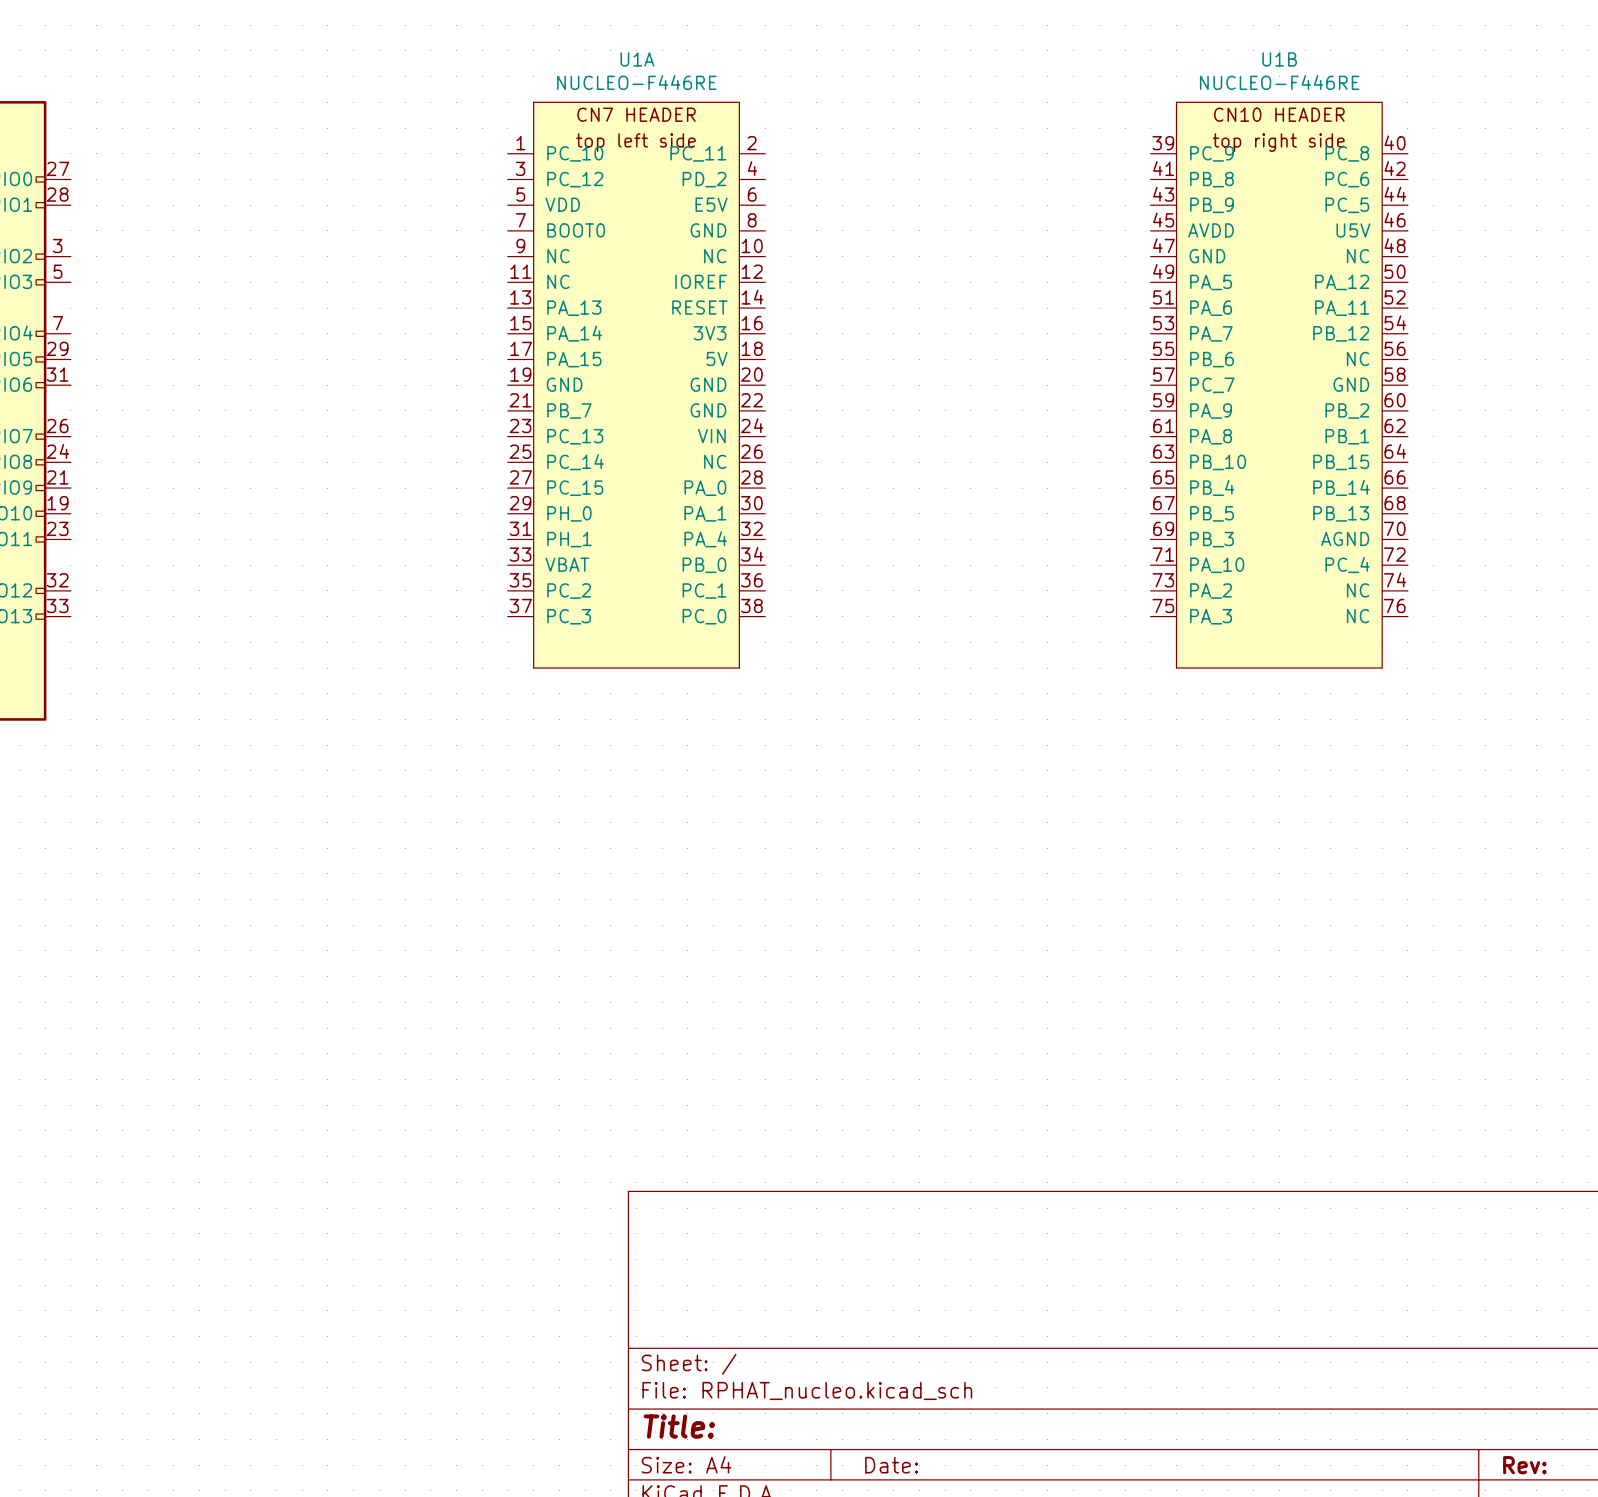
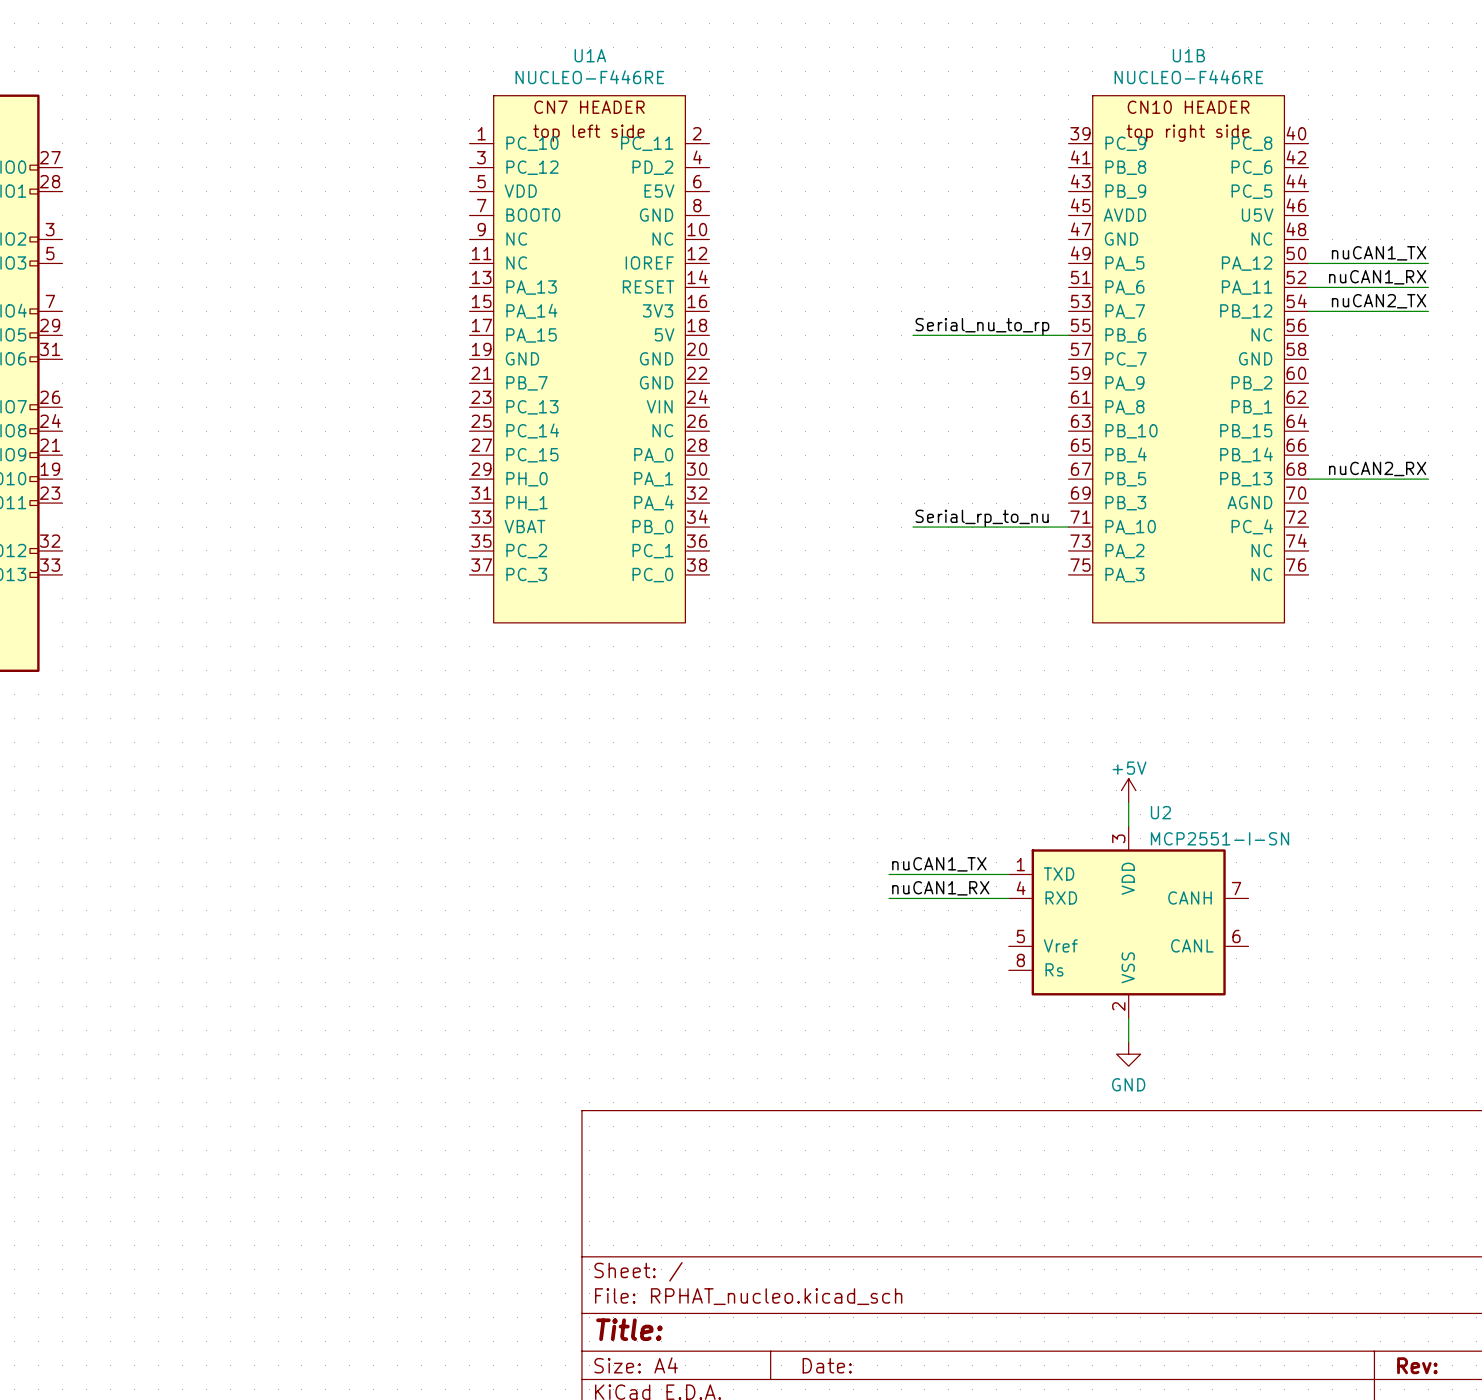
label: none -> nuCAN1_TX (1379, 253)
wire: none -> (1308, 263) (1428, 263)
label: none -> nuCAN1_RX (1377, 277)
wire: none -> (1308, 287) (1428, 287)
label: none -> nuCAN2_TX (1379, 301)
wire: none -> (1308, 311) (1428, 311)
label: none -> Serial_nu_to_rp (982, 326)
wire: none -> (913, 335) (1068, 335)
label: none -> nuCAN2_RX (1377, 468)
wire: none -> (1308, 479) (1428, 479)
label: none -> Serial_rp_to_nu (982, 518)
wire: none -> (913, 527) (1068, 527)
power symbol: none -> +5V (1128, 790)
wire: none -> (1128, 802) (1128, 826)
label: none -> nuCAN1_TX (939, 864)
wire: none -> (889, 874) (1008, 874)
label: none -> nuCAN1_RX (940, 888)
wire: none -> (889, 898) (1008, 898)
U2: none -> MCP2551-I-SN (1128, 922)
wire: none -> (1128, 1018) (1128, 1042)
power symbol: none -> GND (1128, 1054)

